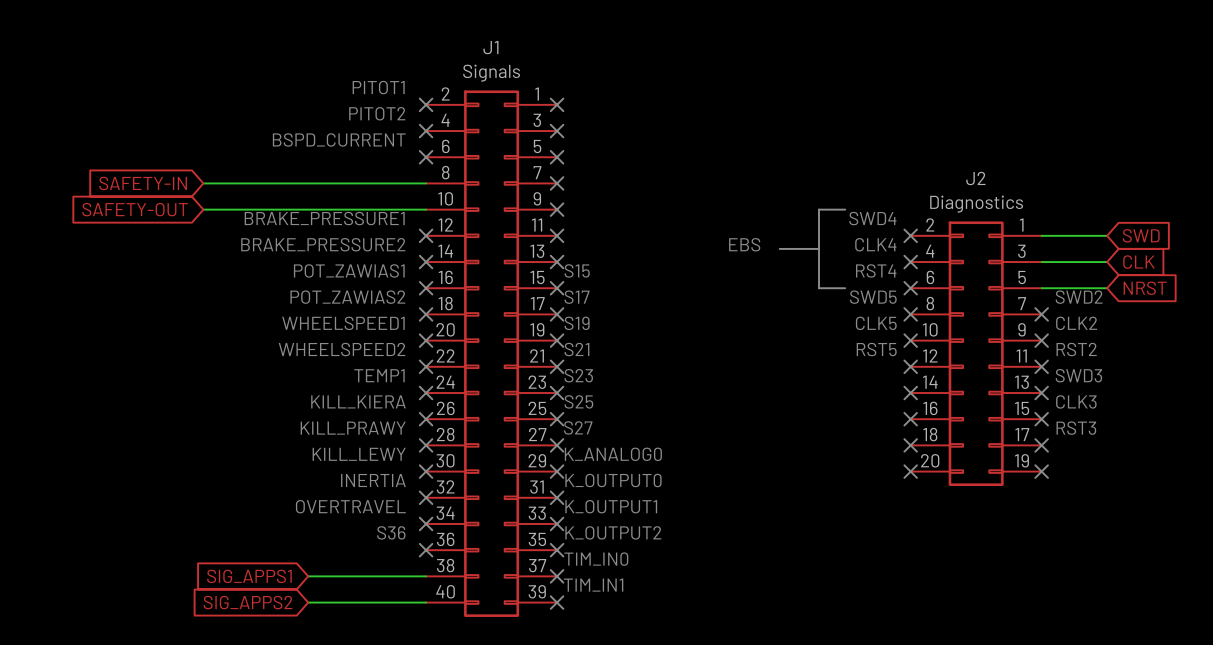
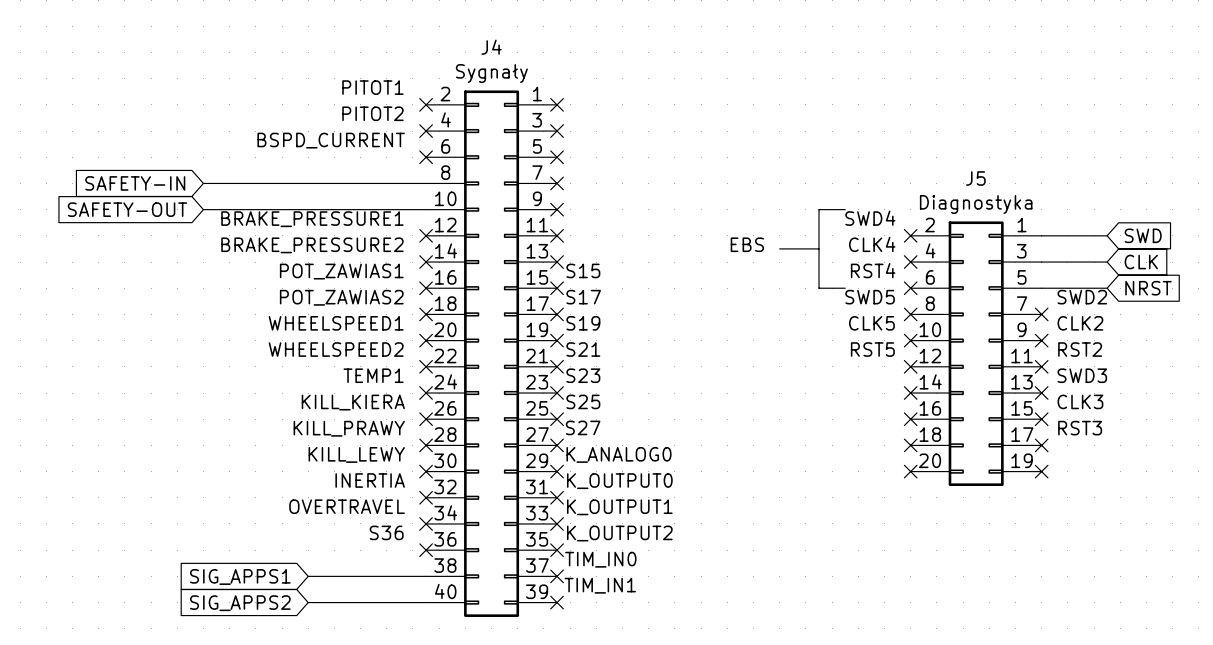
J1 name: J1 (490, 47) -> J4 (491, 47)
J1 value: Signals (491, 73) -> Sygnały (491, 73)
J2 name: J2 (975, 178) -> J5 (975, 178)
J2 value: Diagnostics (976, 204) -> Diagnostyka (976, 204)

